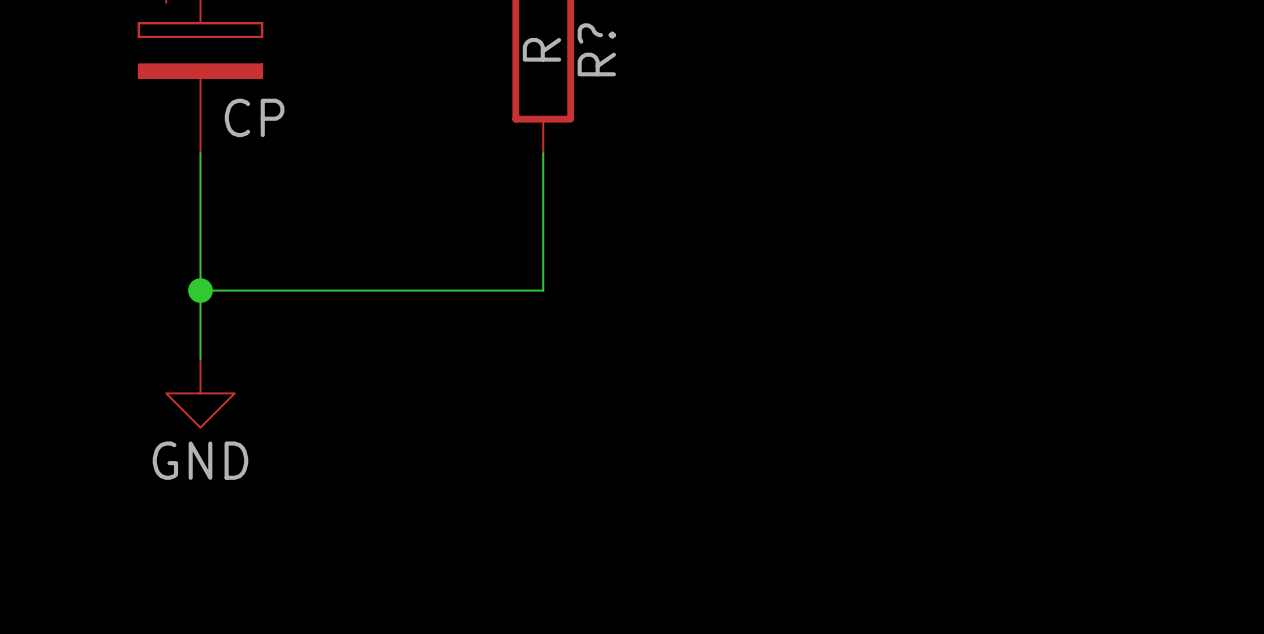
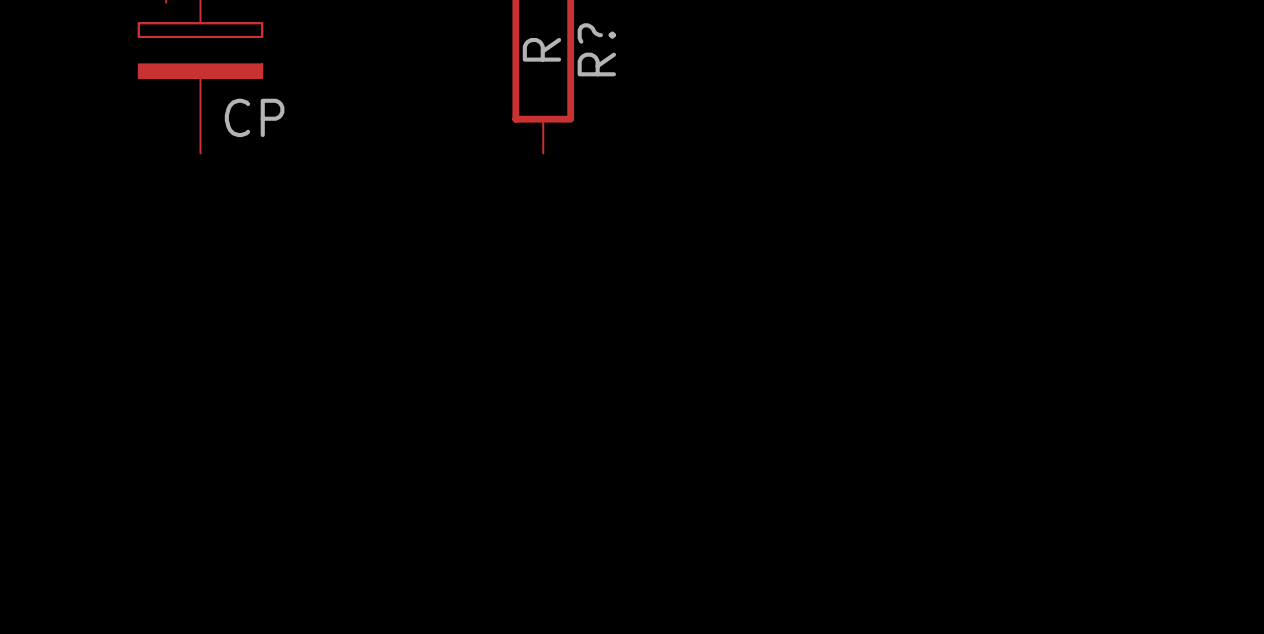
wire: (200, 153) (200, 359) -> none
wire: (543, 153) (543, 290) (200, 290) -> none
junction: (200, 290) -> none
power symbol: GND (200, 393) -> none

